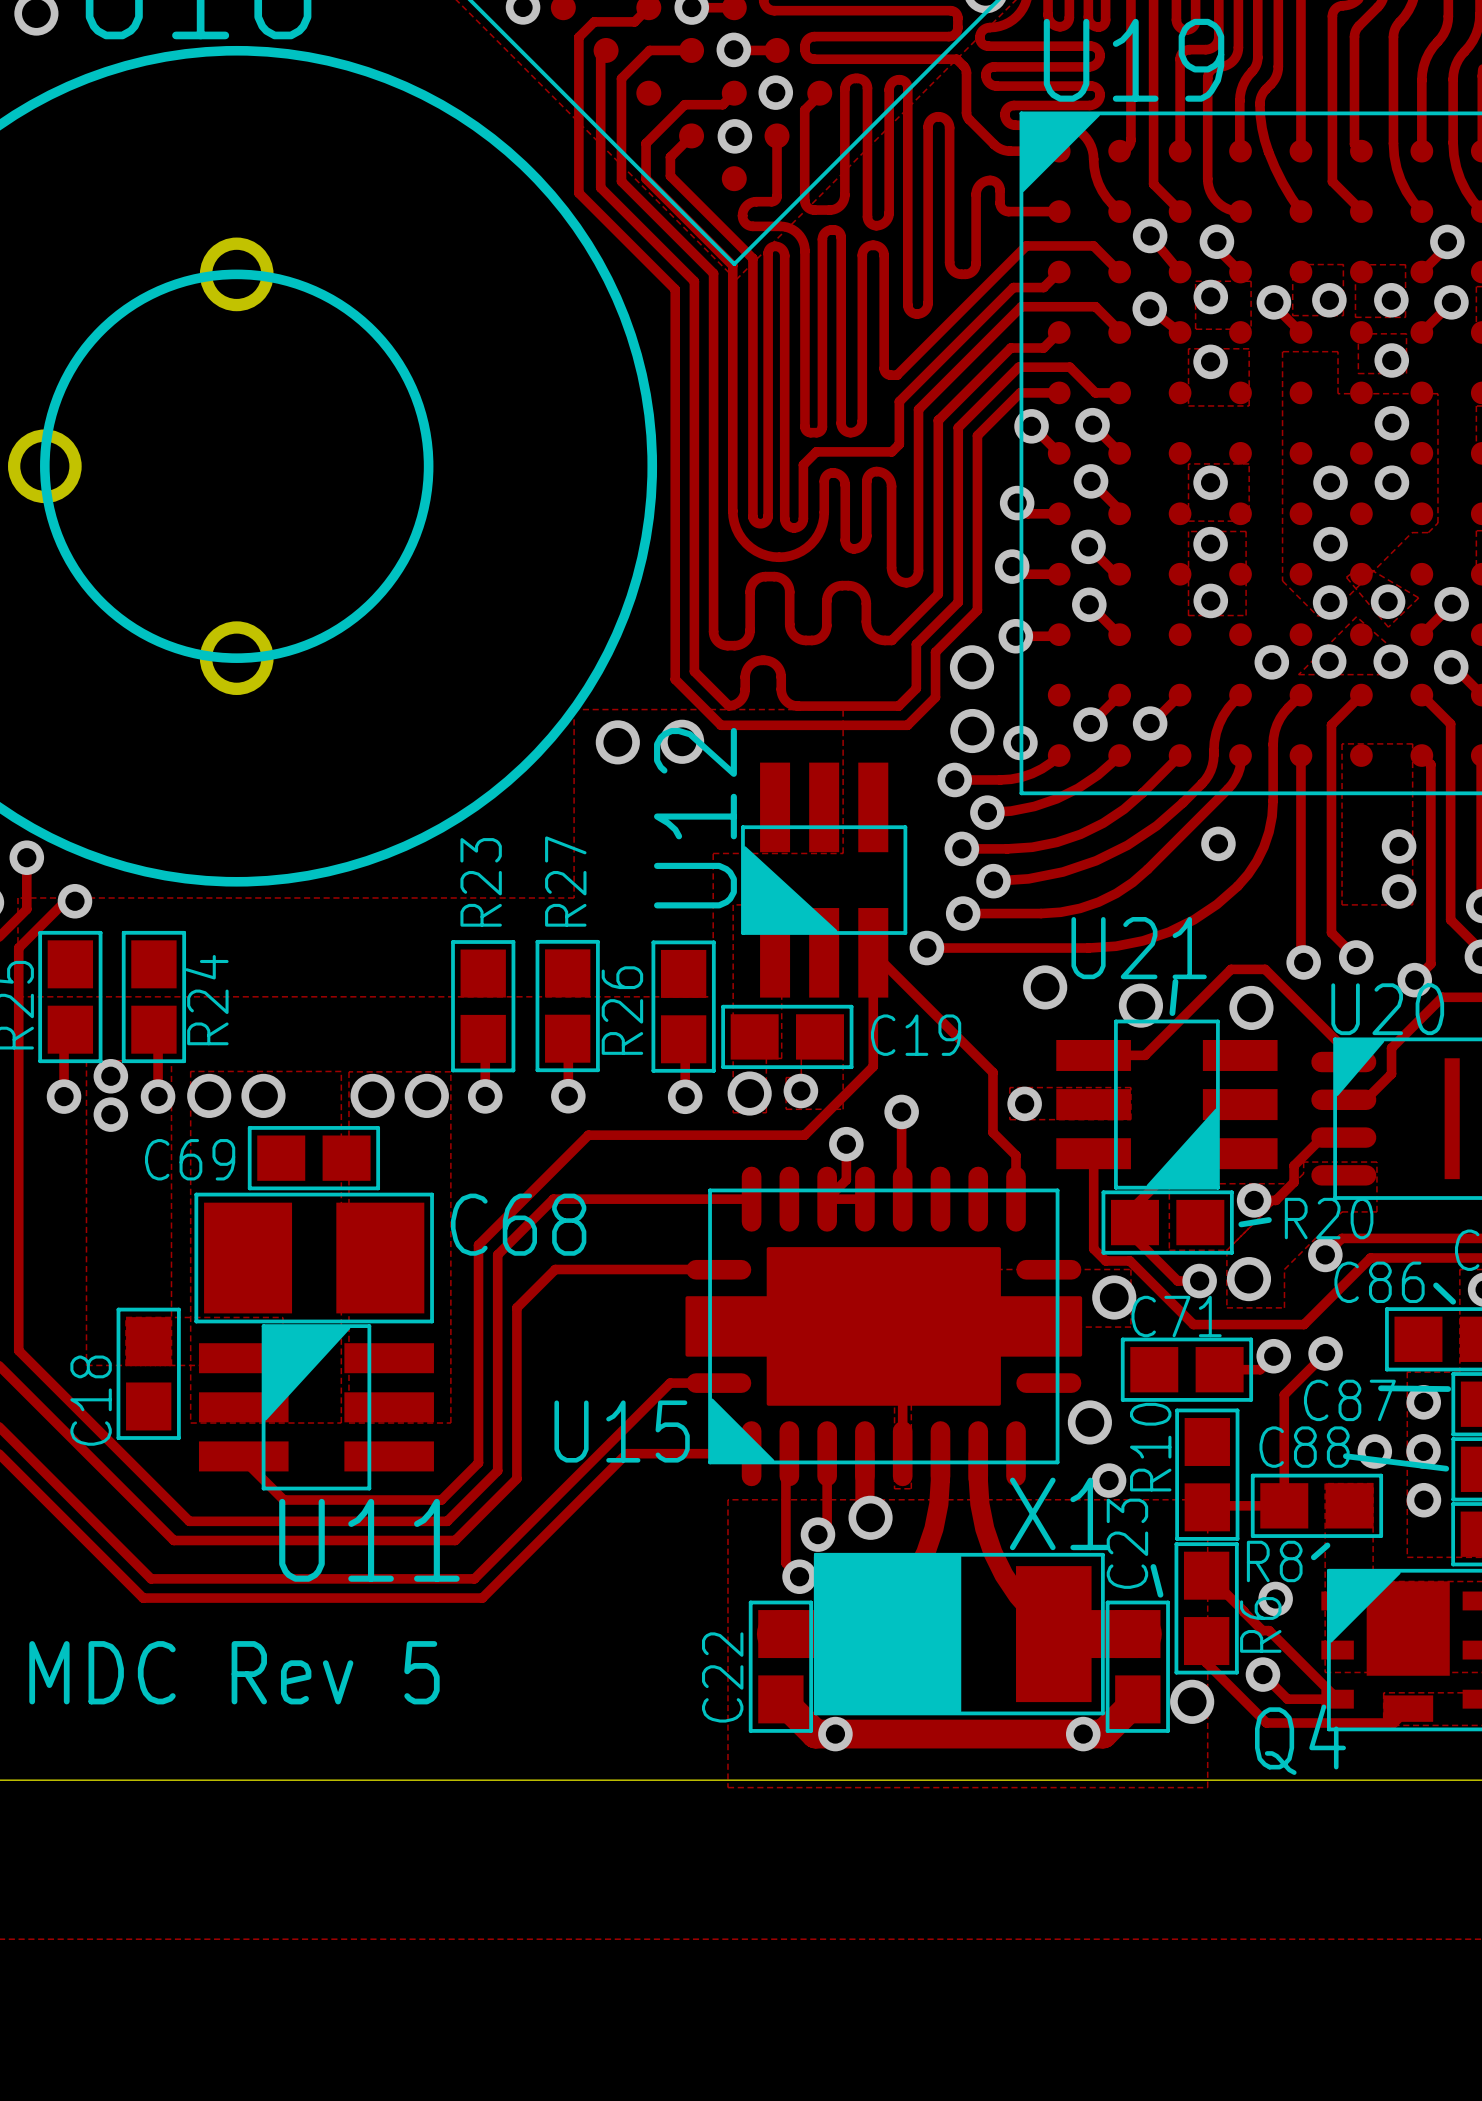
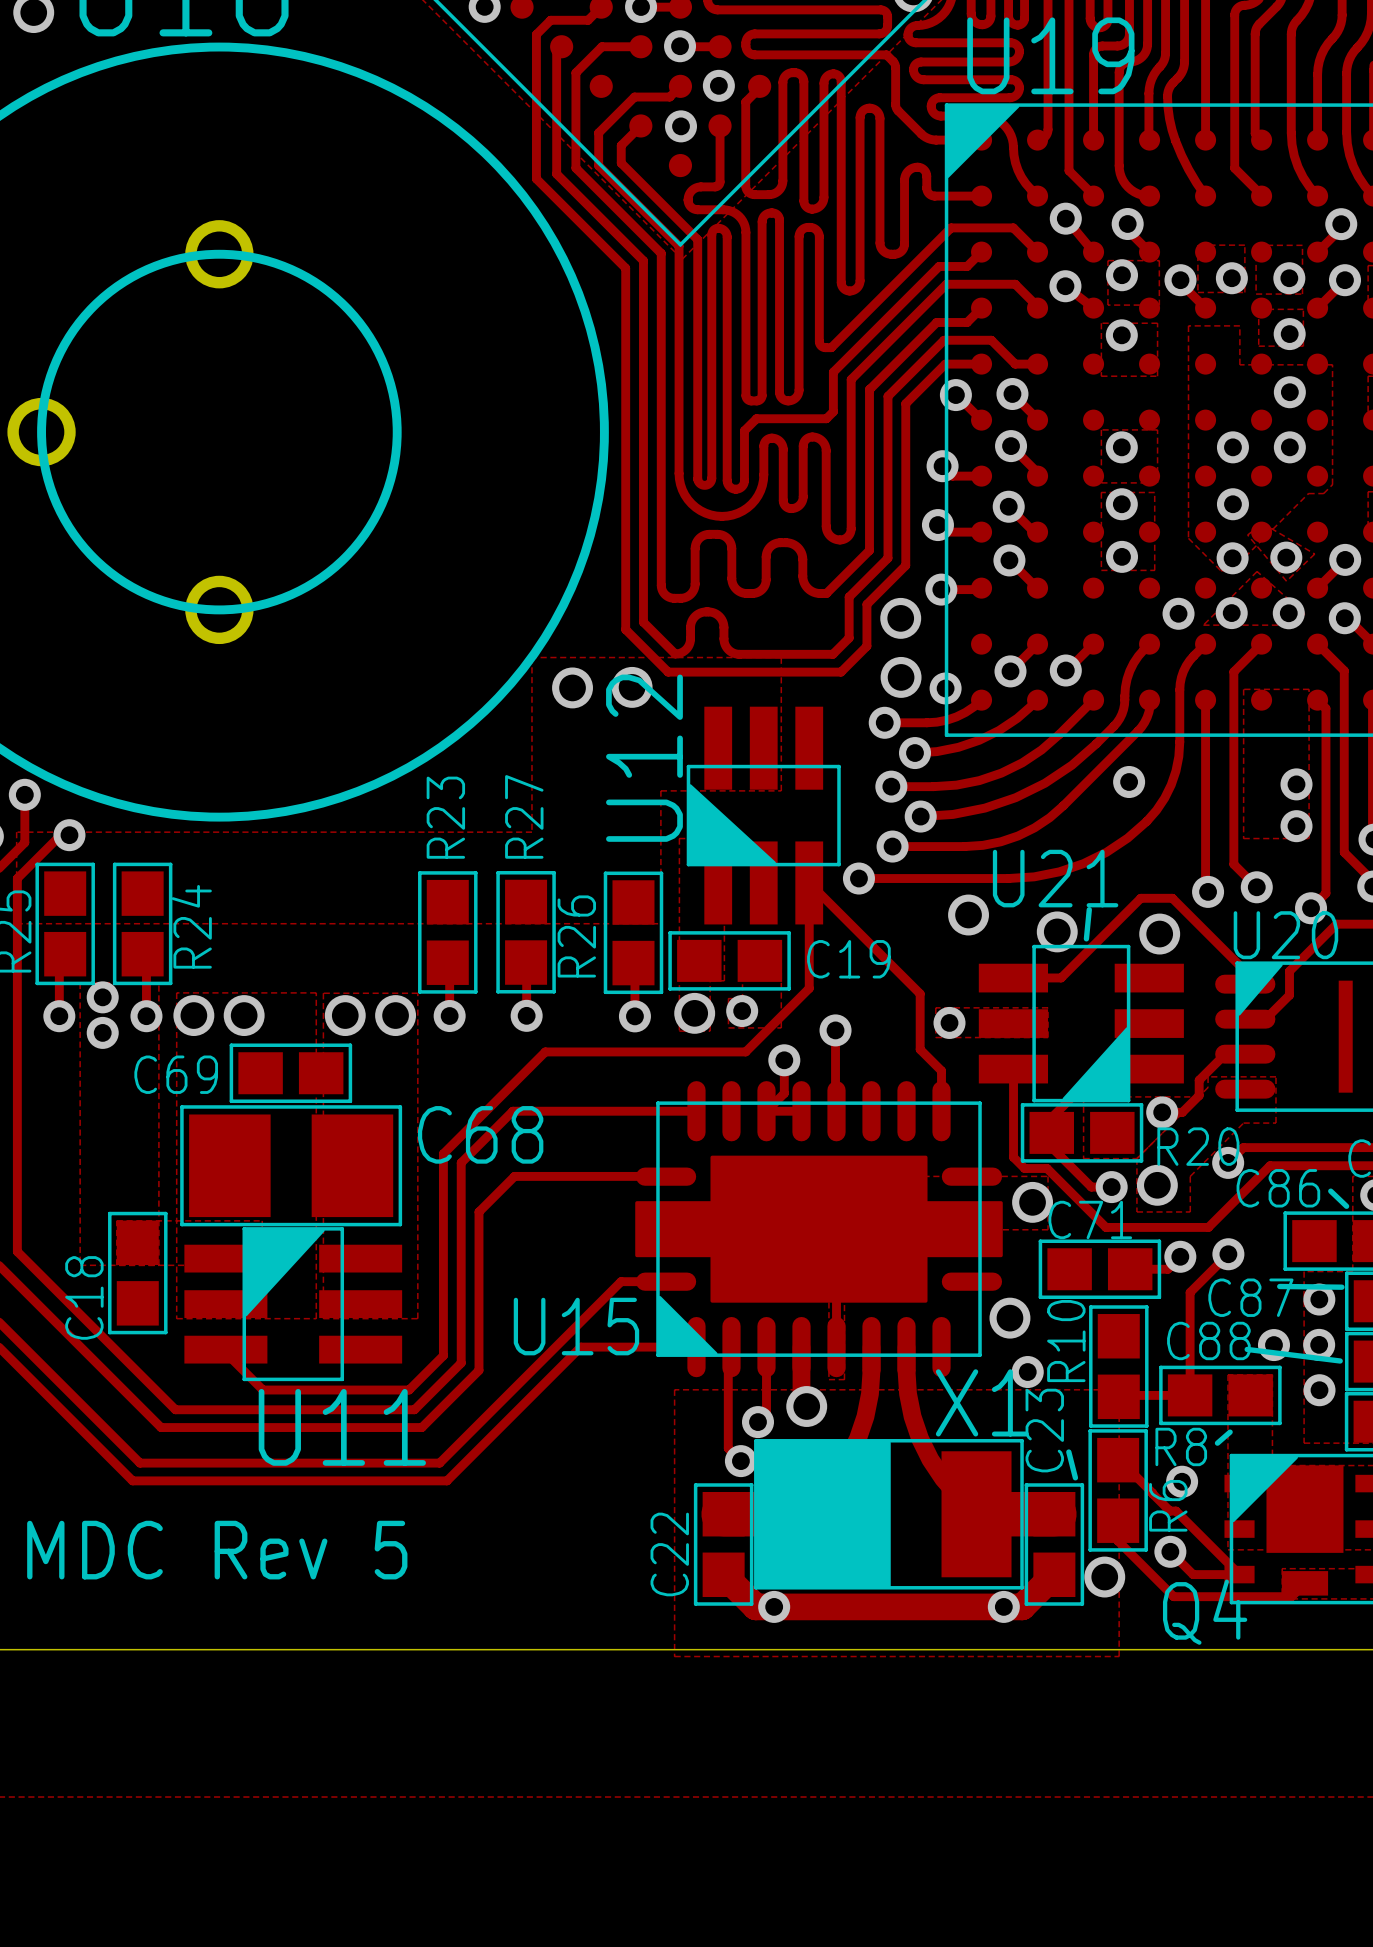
R20 name position: R20 (1329, 1218) -> R20 (1198, 1146)
line: (1268, 1219) (1241, 1224) -> none

